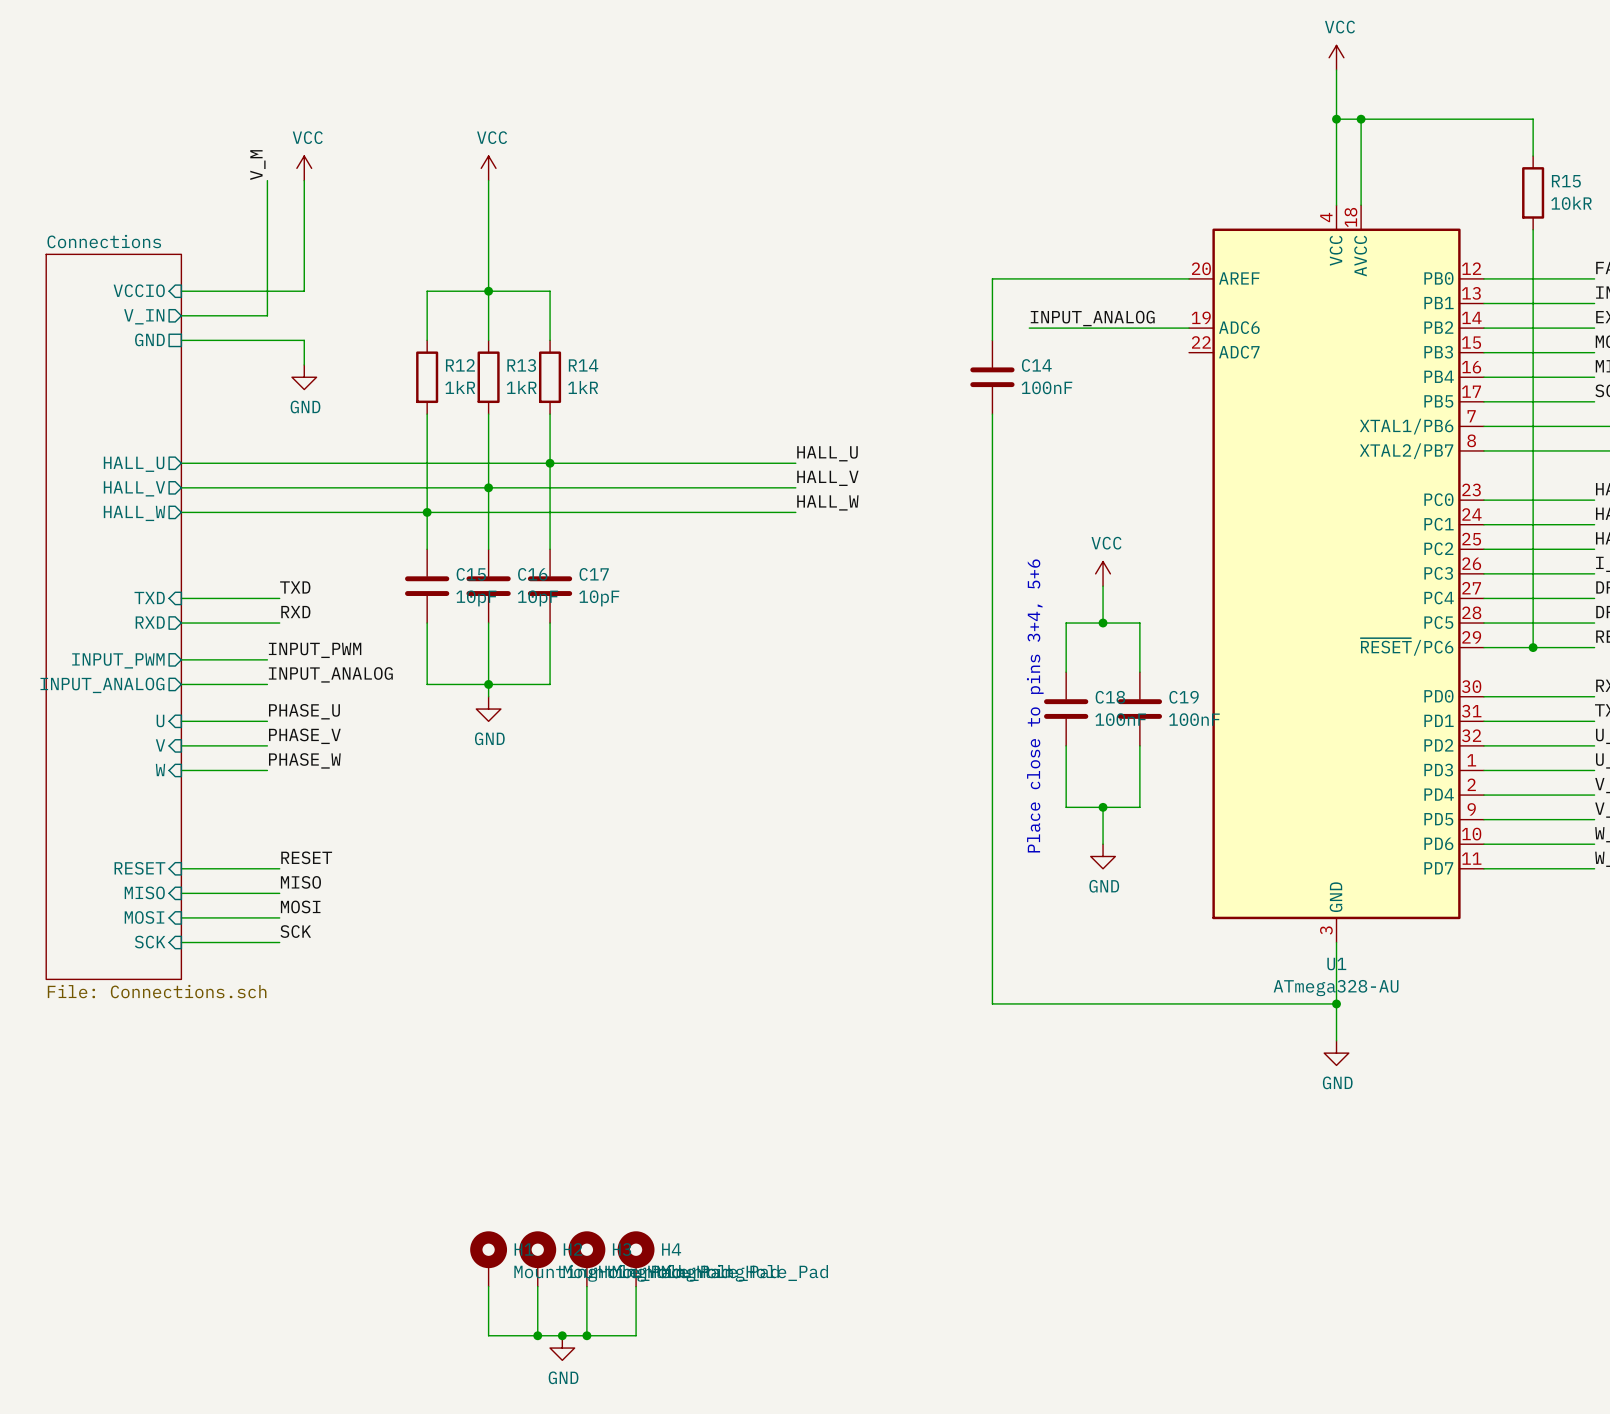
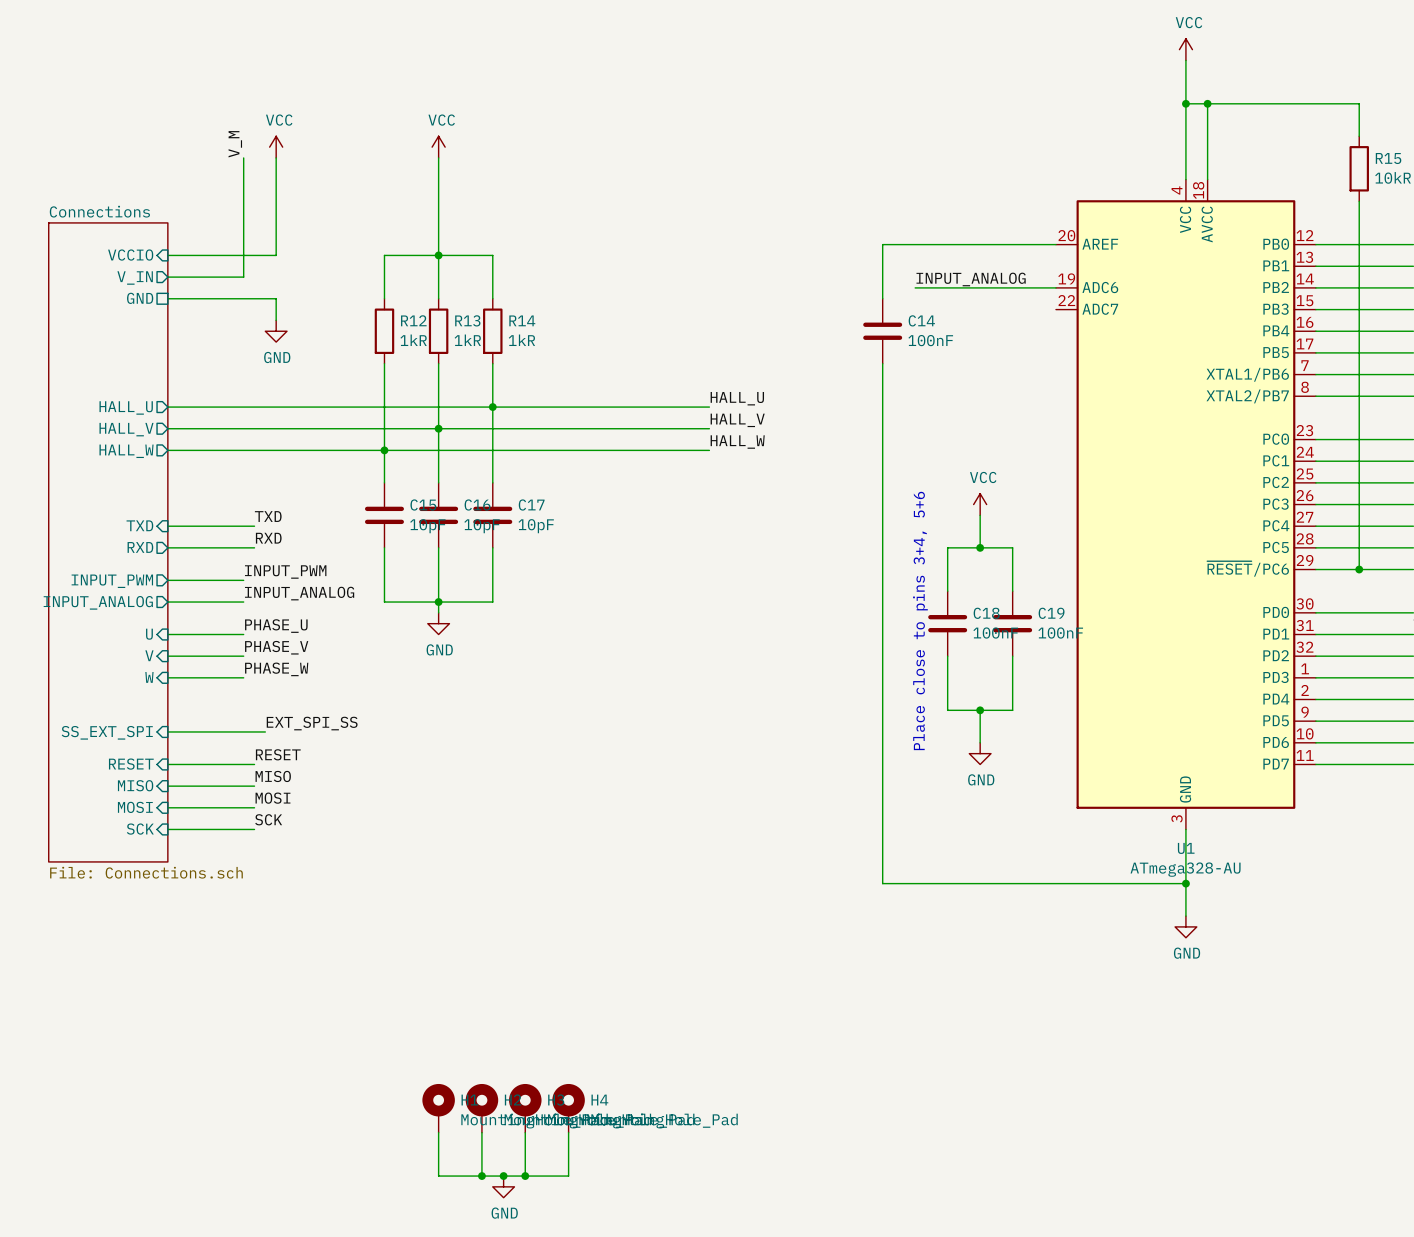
label: none -> EXT_SPI_SS (312, 723)
wire: none -> (167, 731) (265, 731)
sheet pin: none -> SS_EXT_SPI (107, 732)

